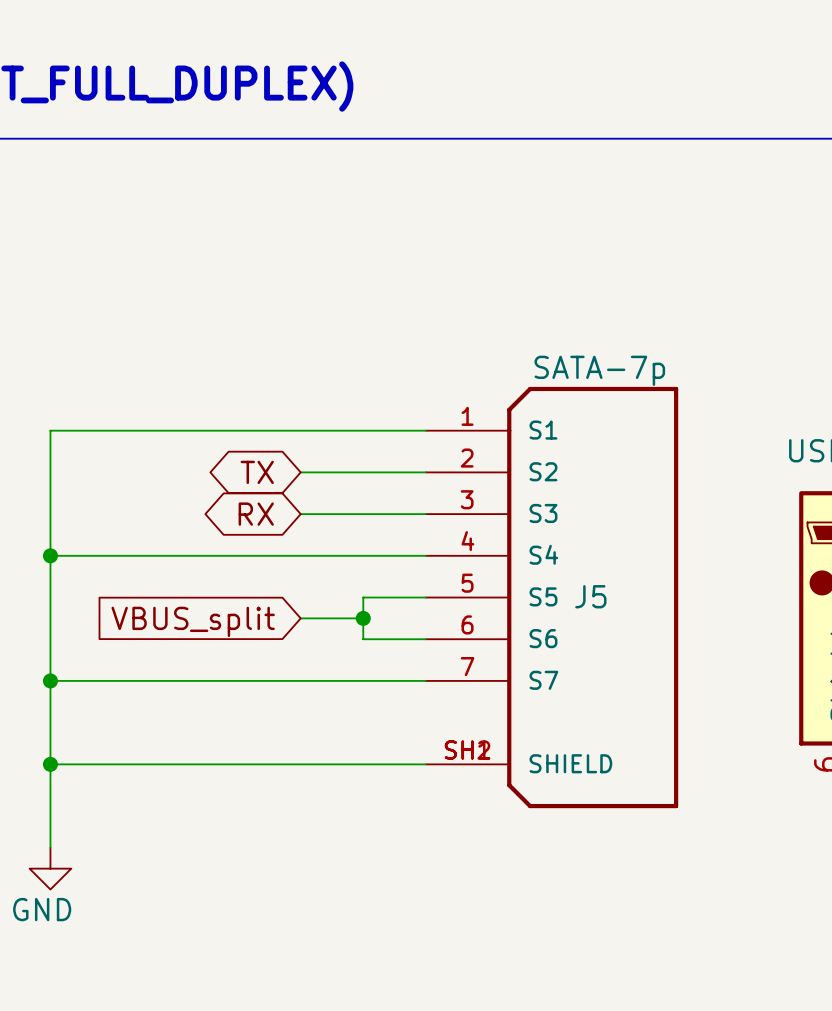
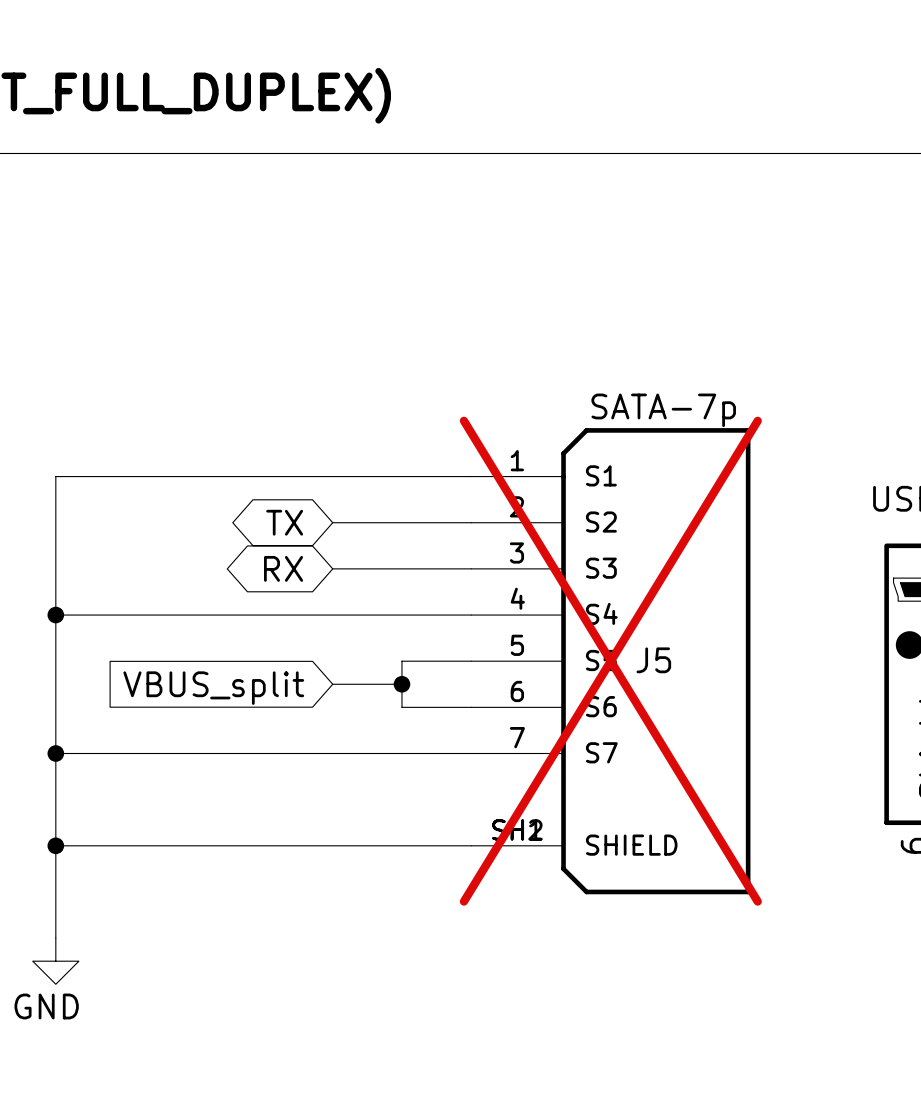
J5 do-not-place cross: none -> (610, 661)

